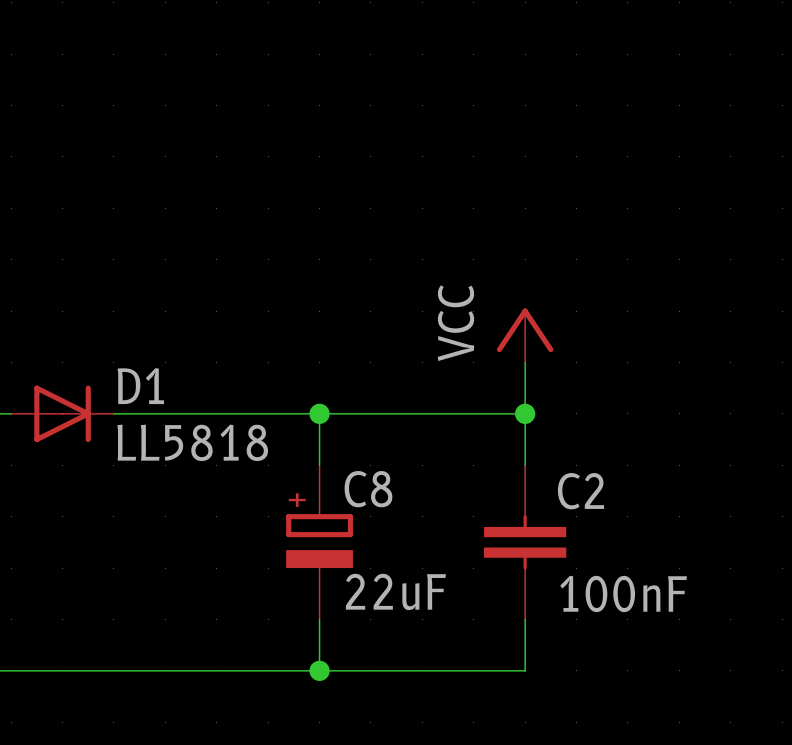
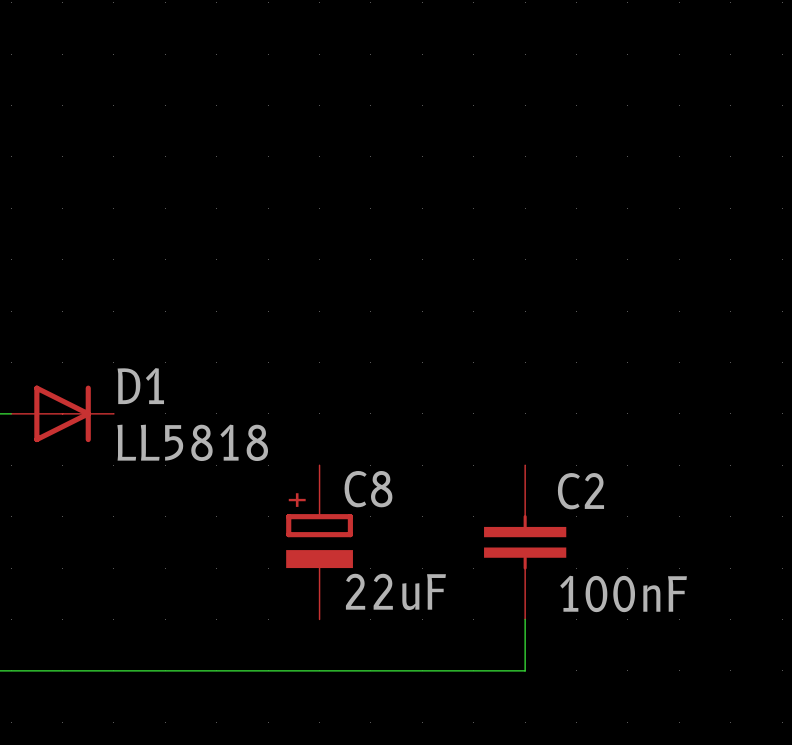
power symbol: VCC (525, 335) -> none
wire: (525, 362) (525, 465) -> none
wire: (113, 413) (525, 413) -> none
wire: (319, 413) (319, 465) -> none
junction: (319, 413) -> none
junction: (525, 413) -> none
wire: (319, 619) (319, 670) -> none
junction: (319, 670) -> none

